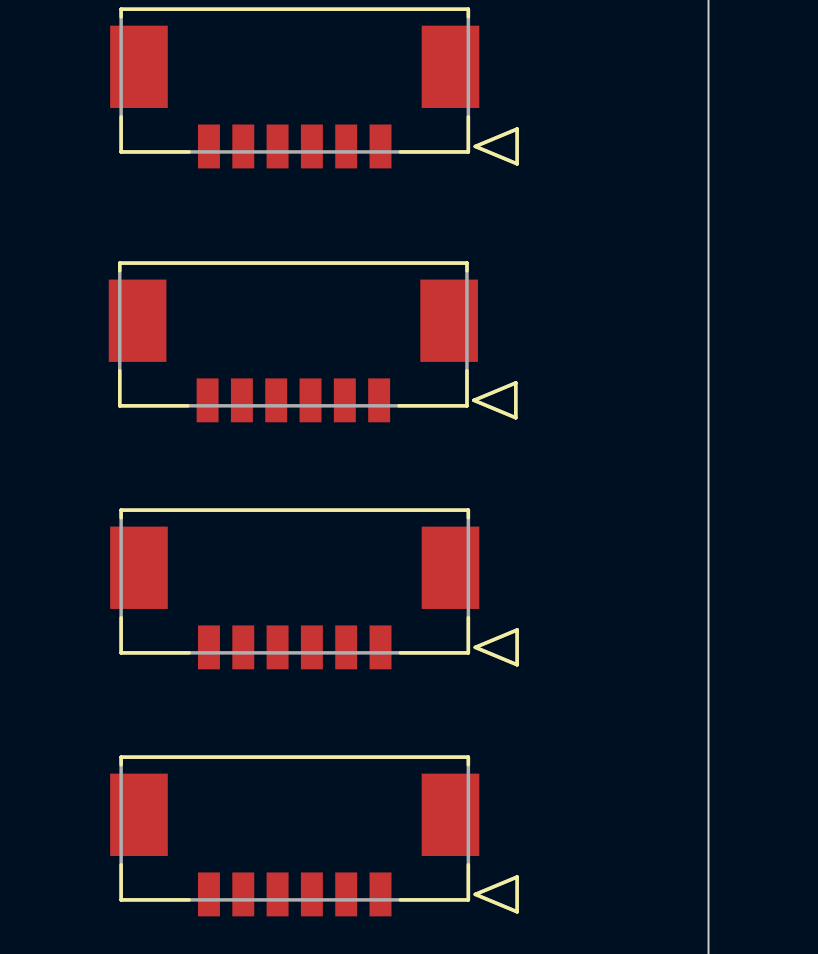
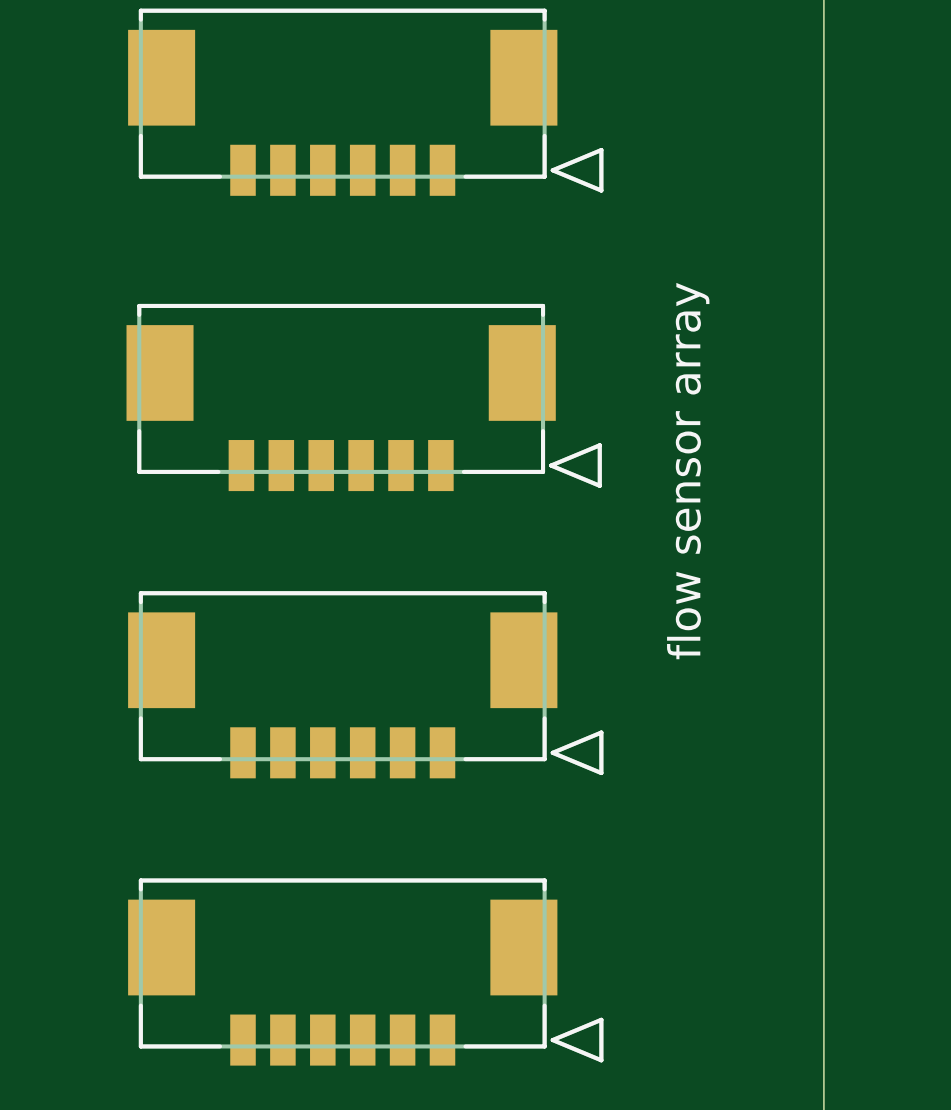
text: none -> flow sensor array (688, 471)

